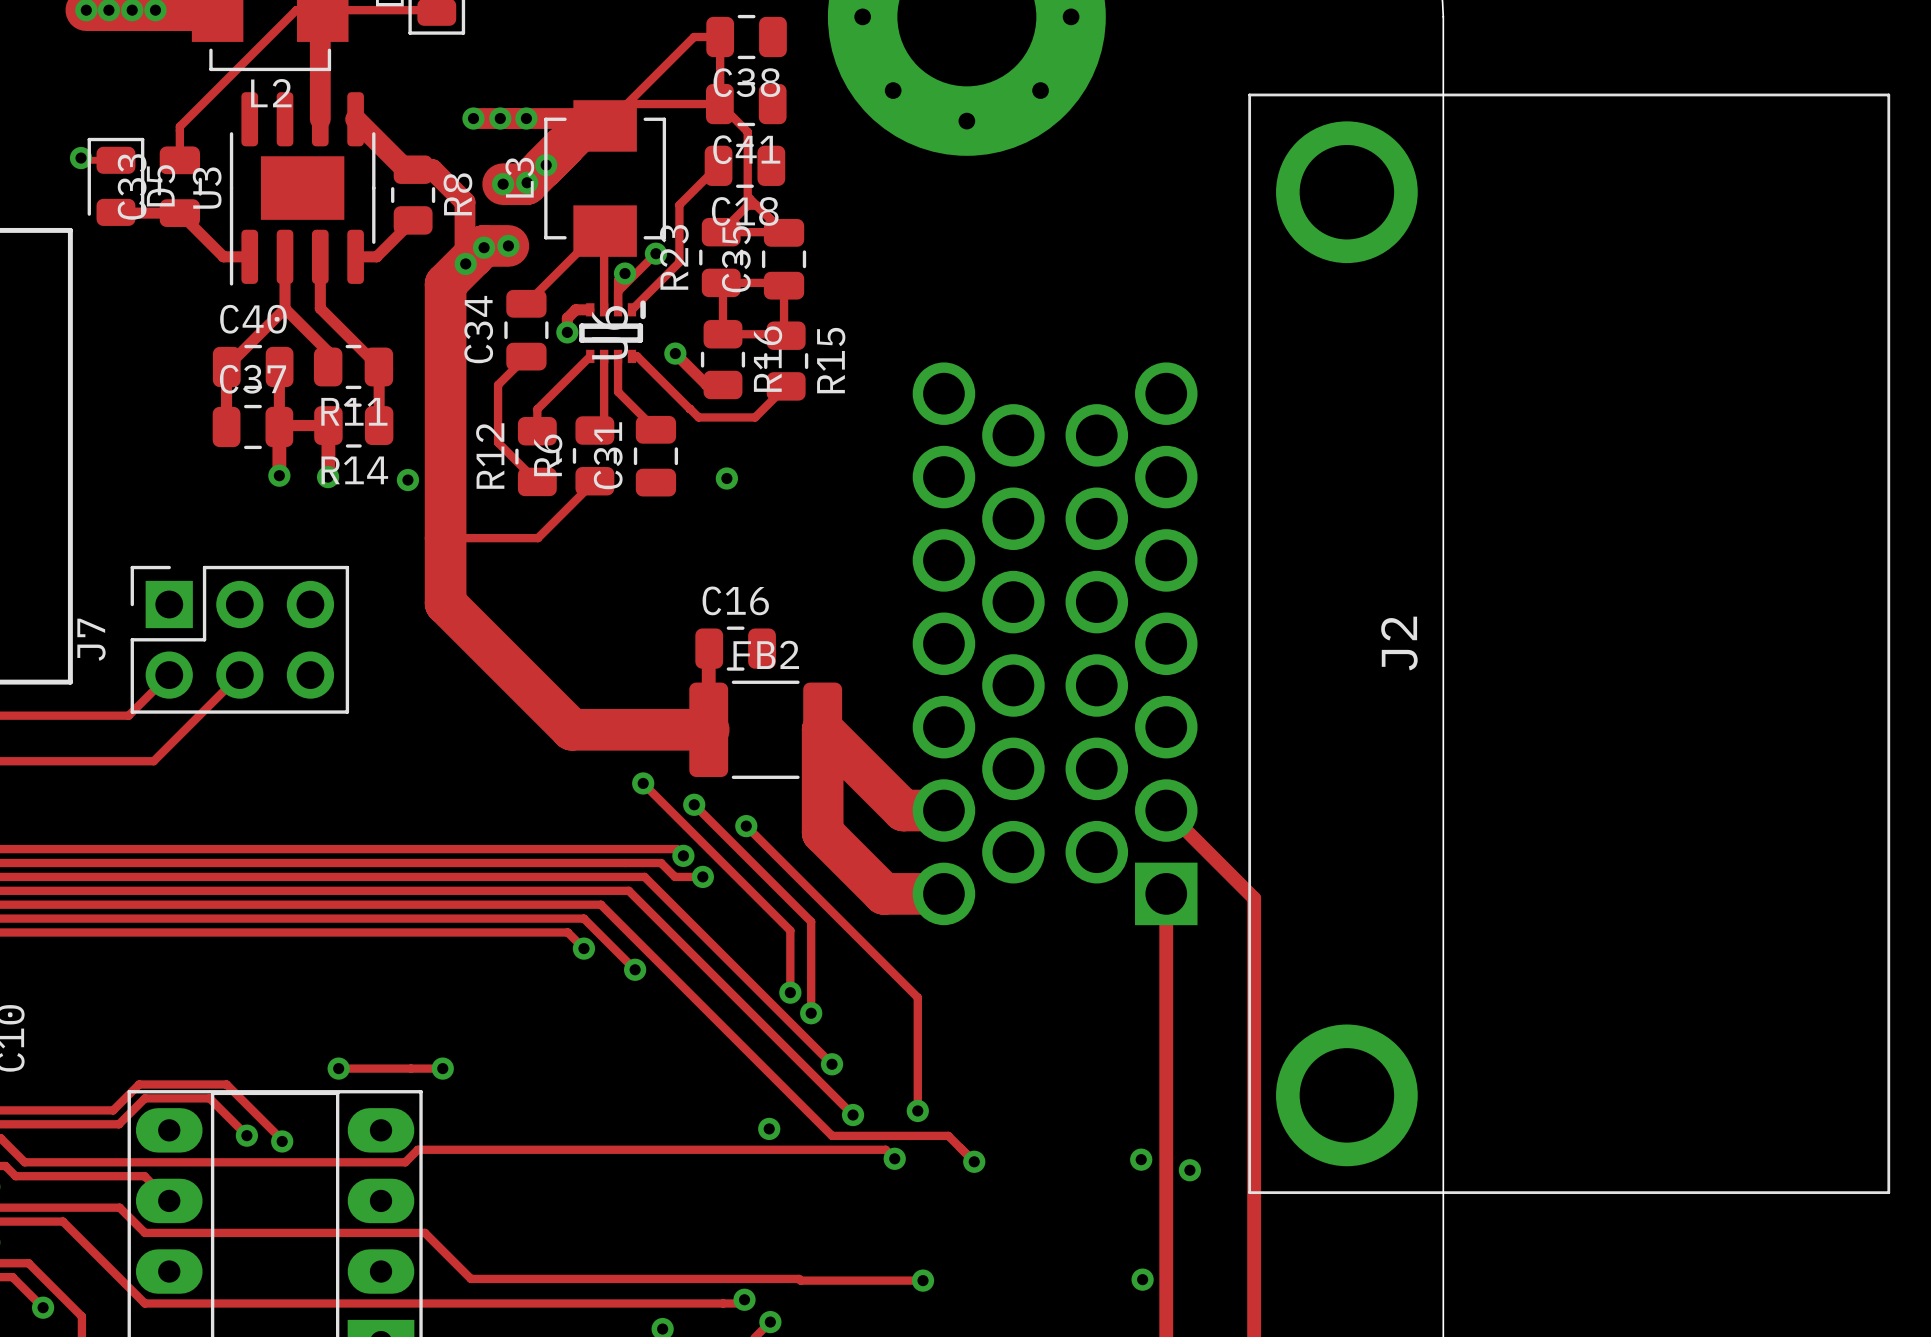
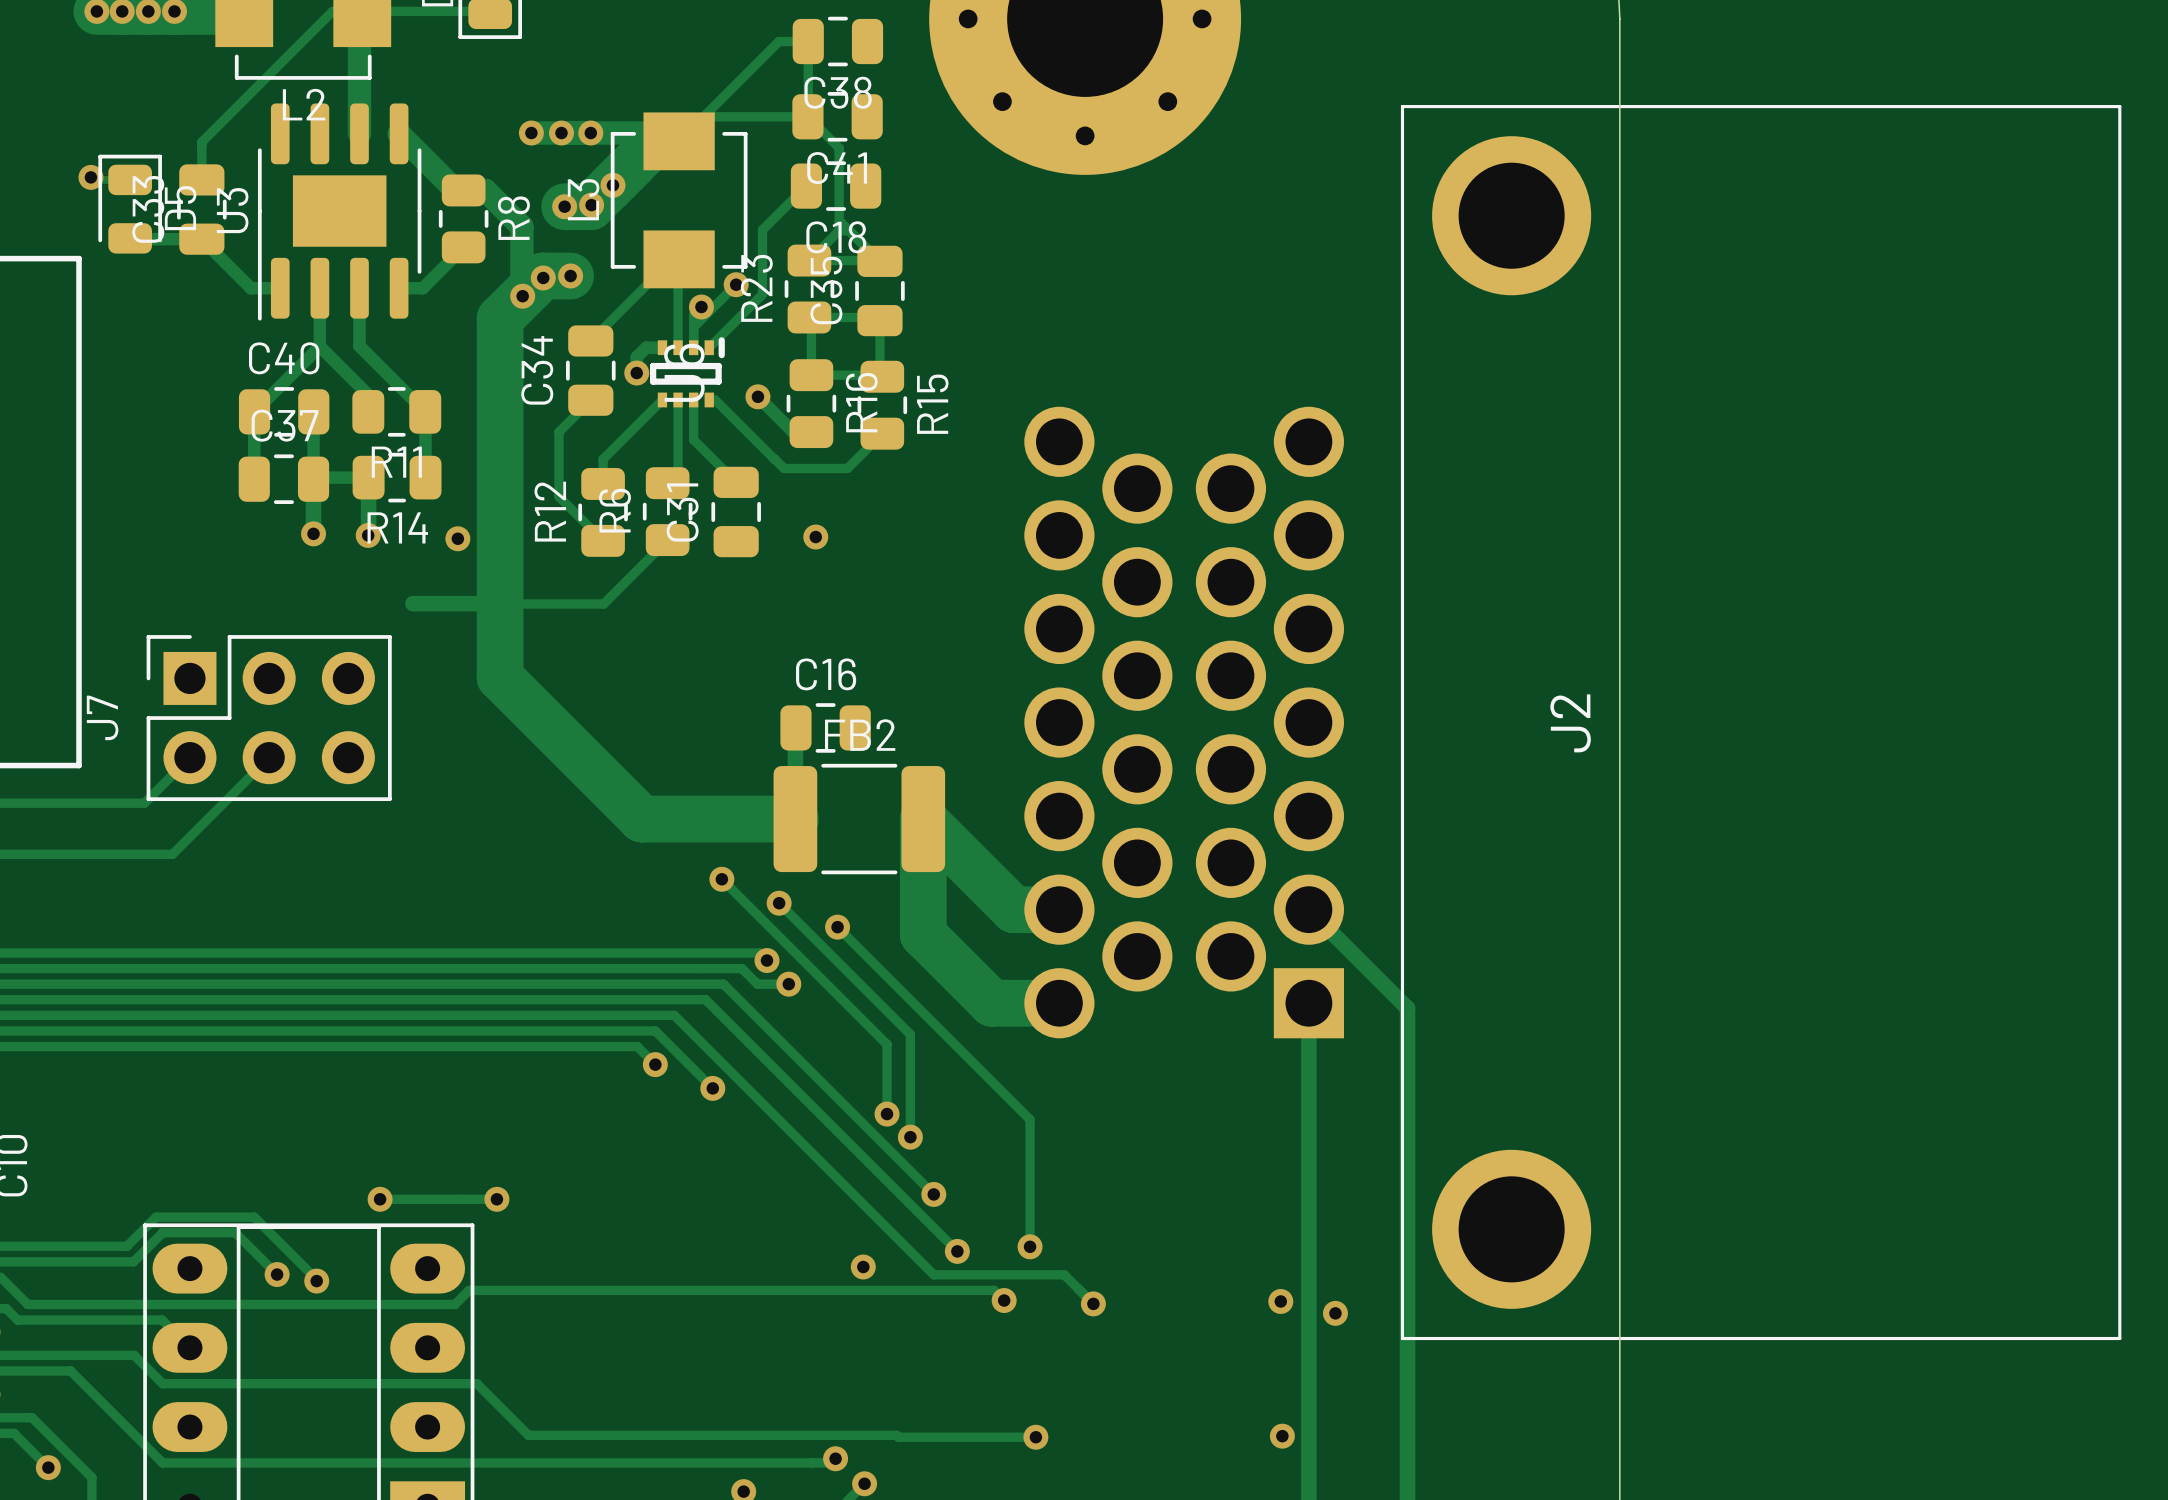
track: none -> (412, 603) (499, 603)

